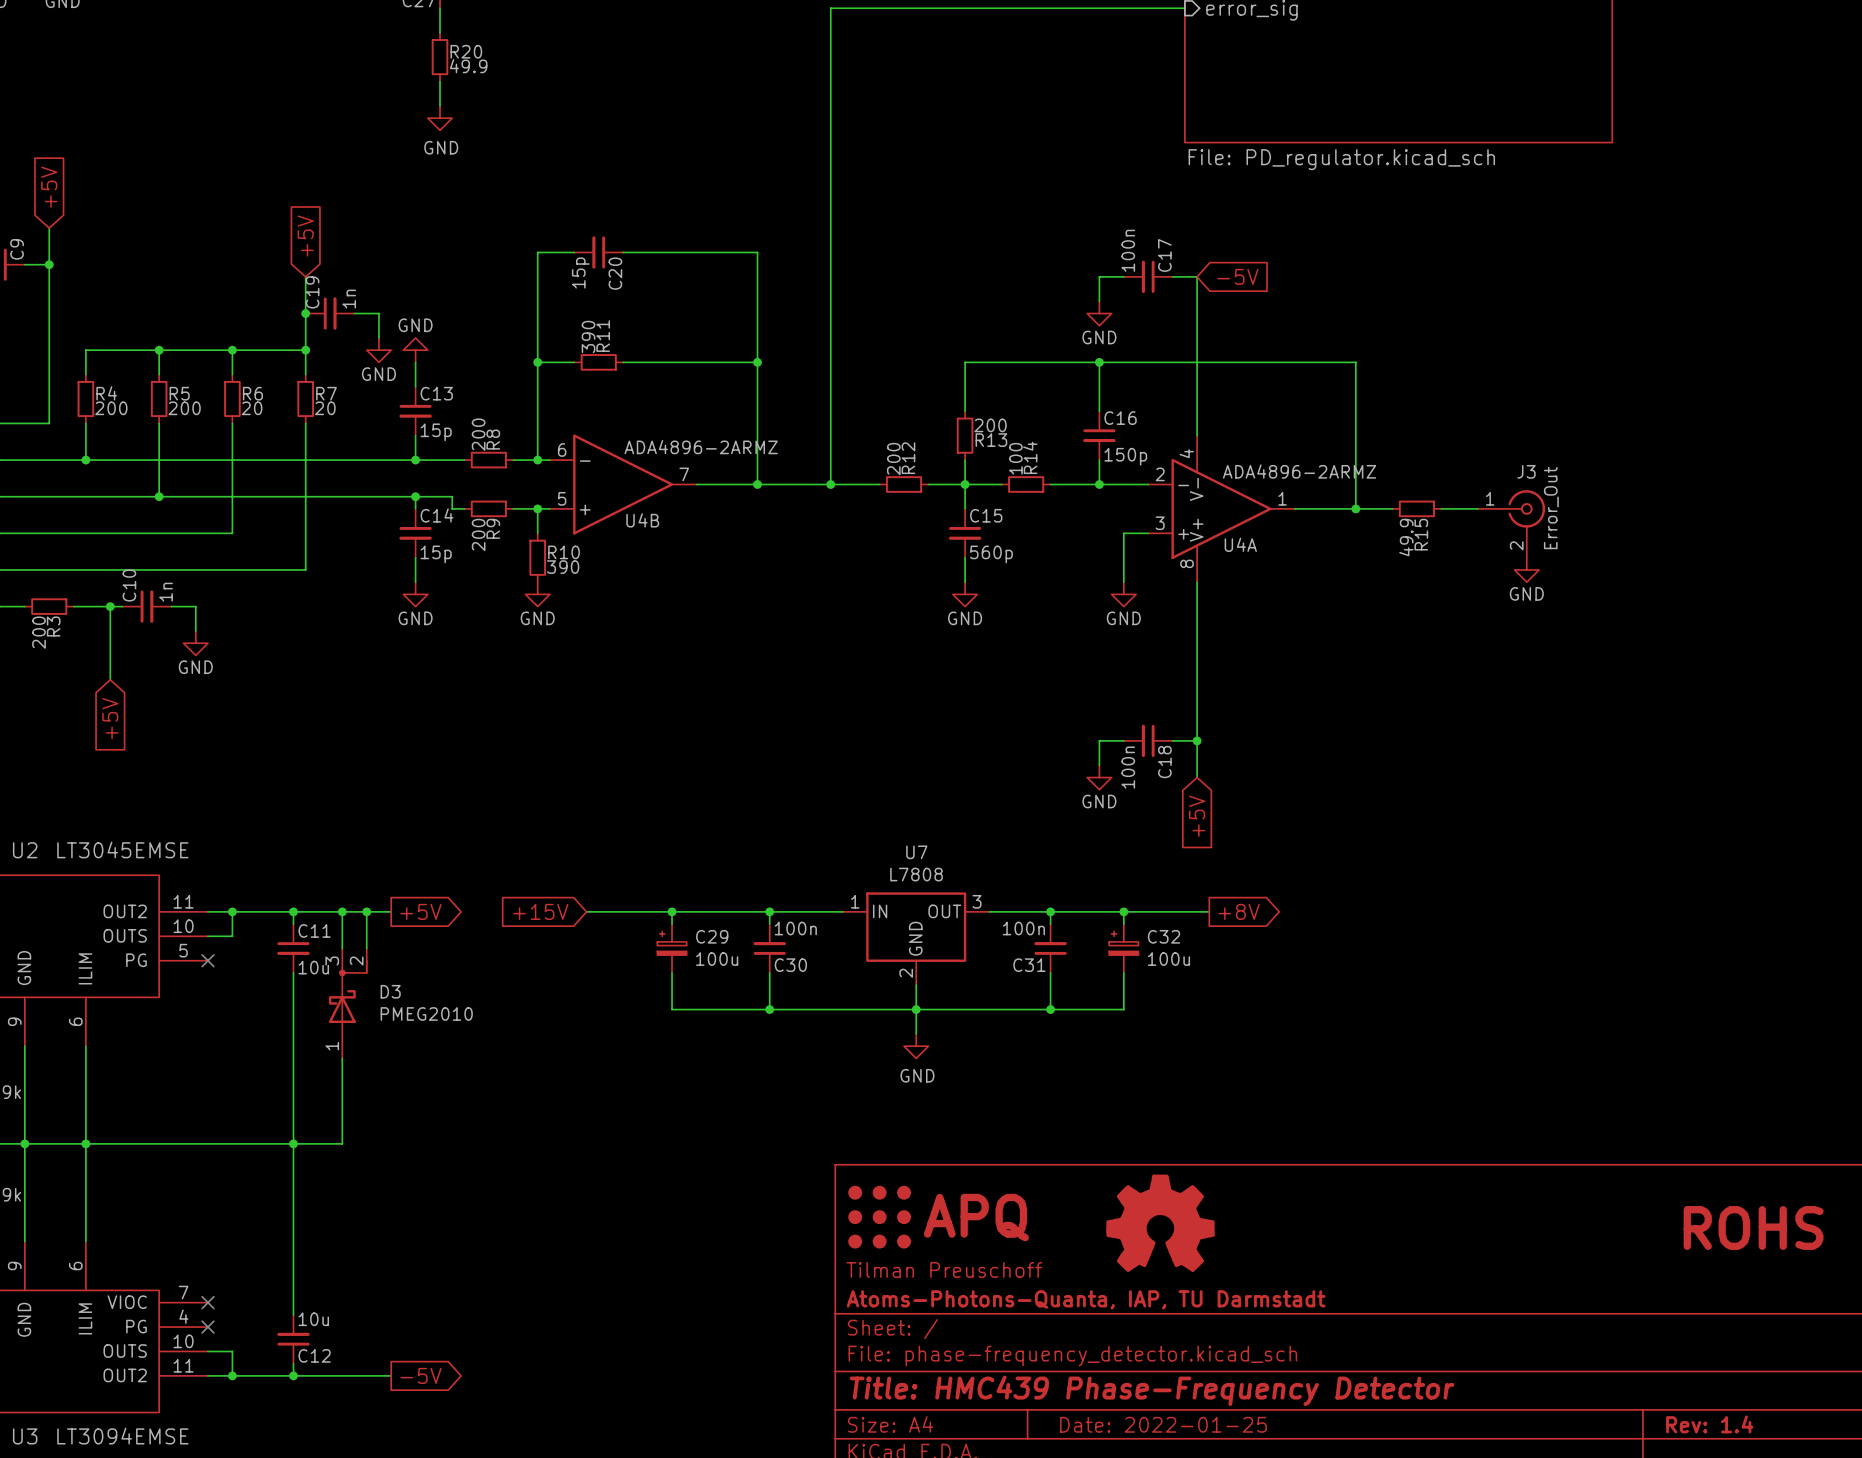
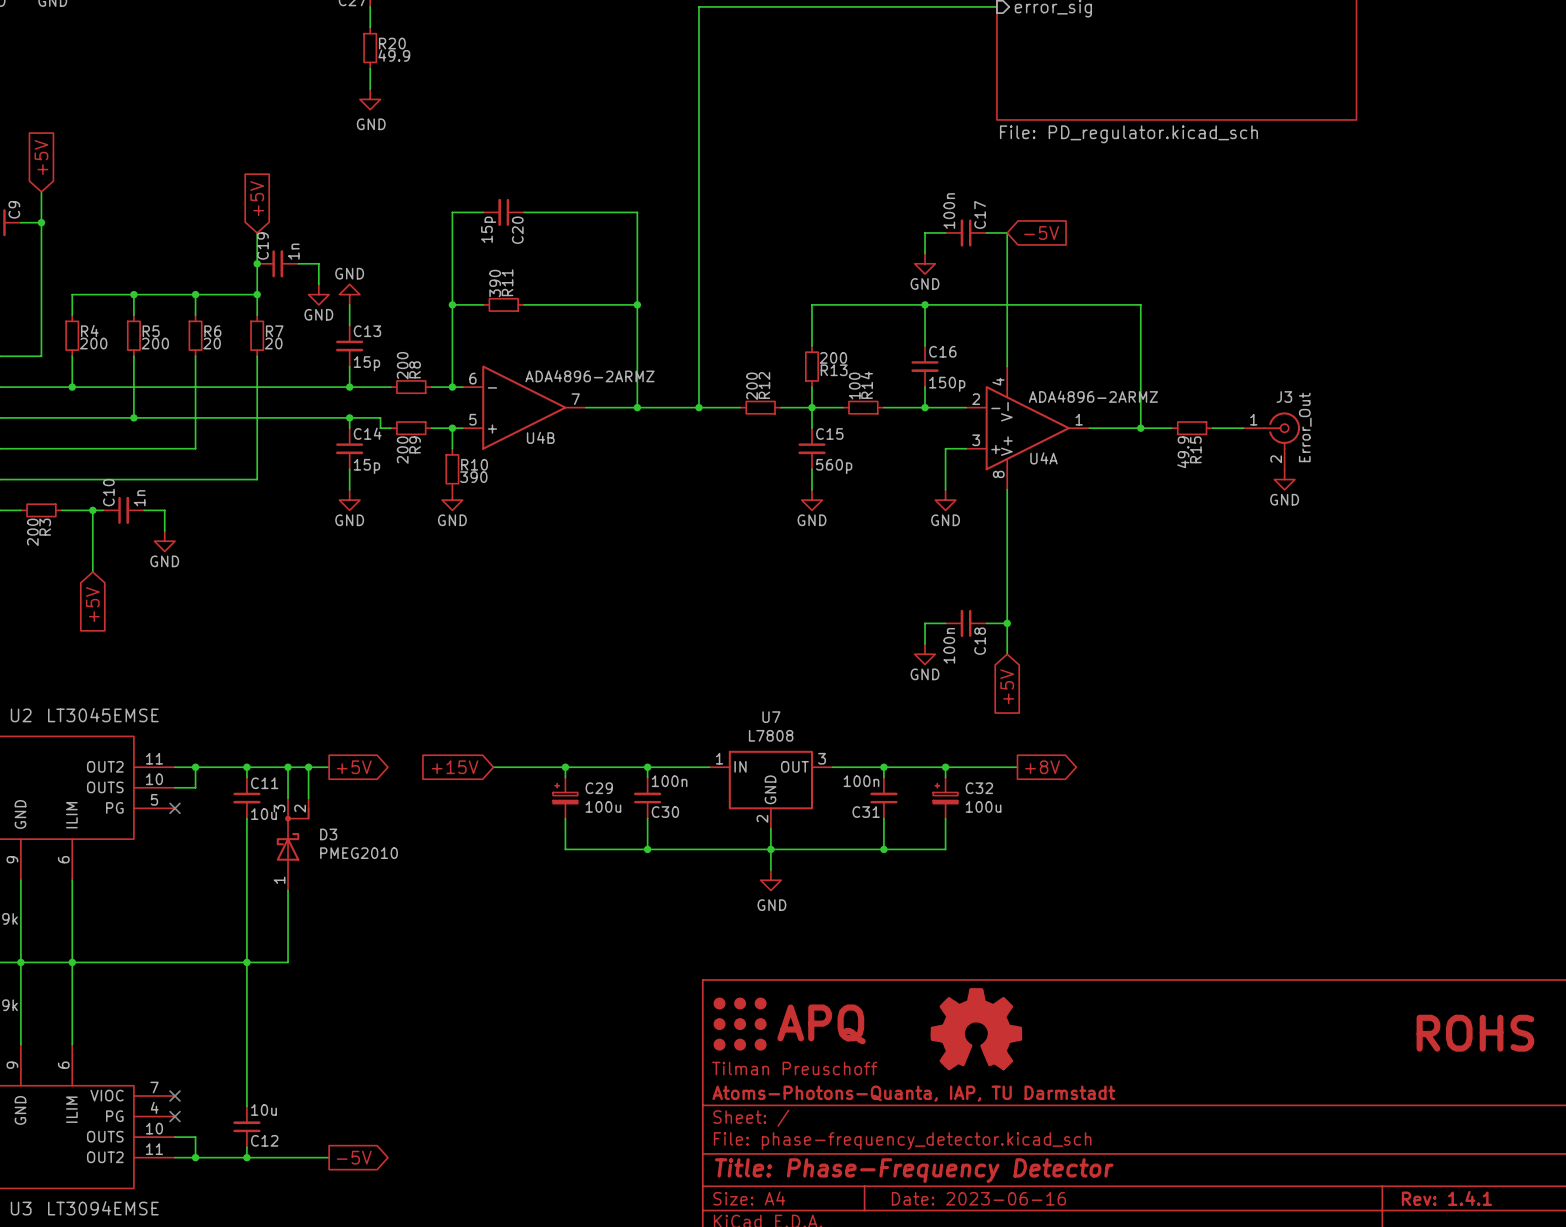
title block: Title: HMC439 Phase-Frequency Detector (1152, 1390) -> Title: Phase-Frequency Detector (914, 1170)
title block: Date: 2022-01-25 (1163, 1424) -> Date: 2023-06-16 (978, 1198)
title block: Rev: 1.4 (1709, 1424) -> Rev: 1.4.1 (1446, 1198)

